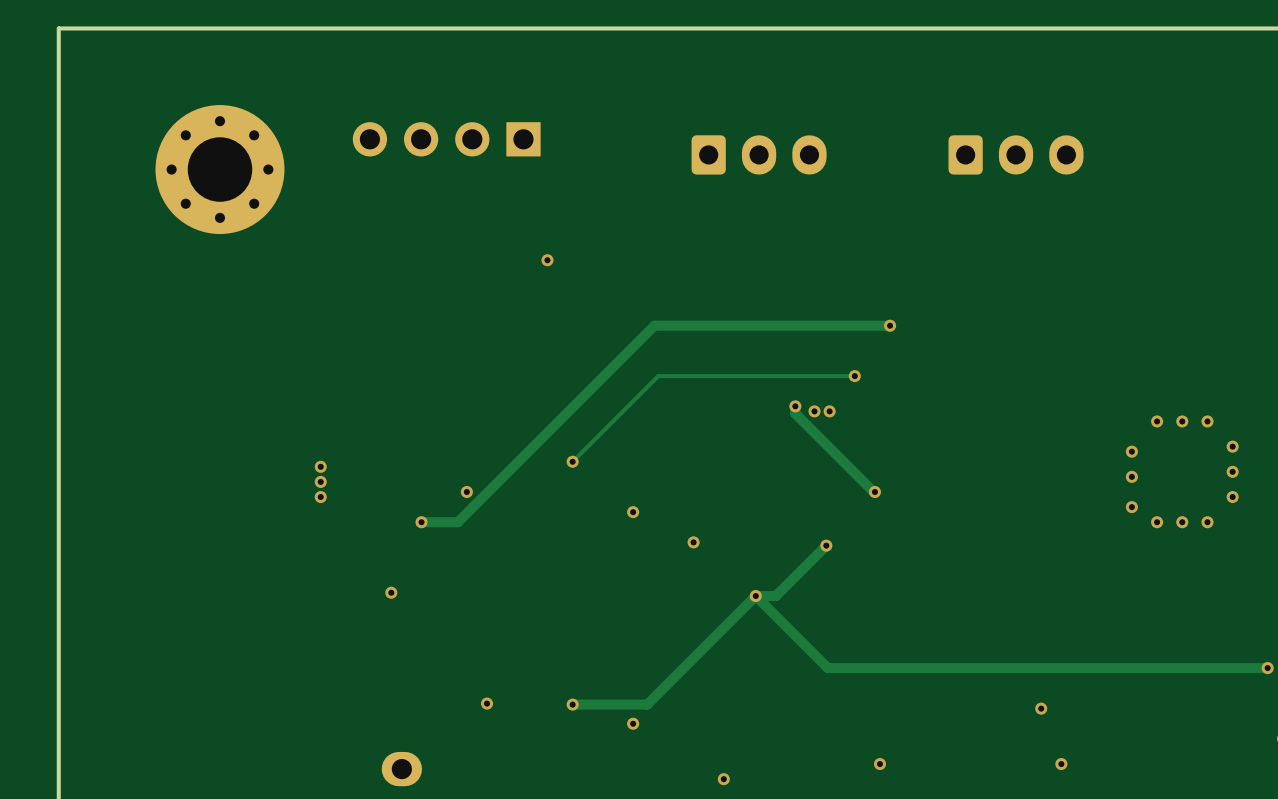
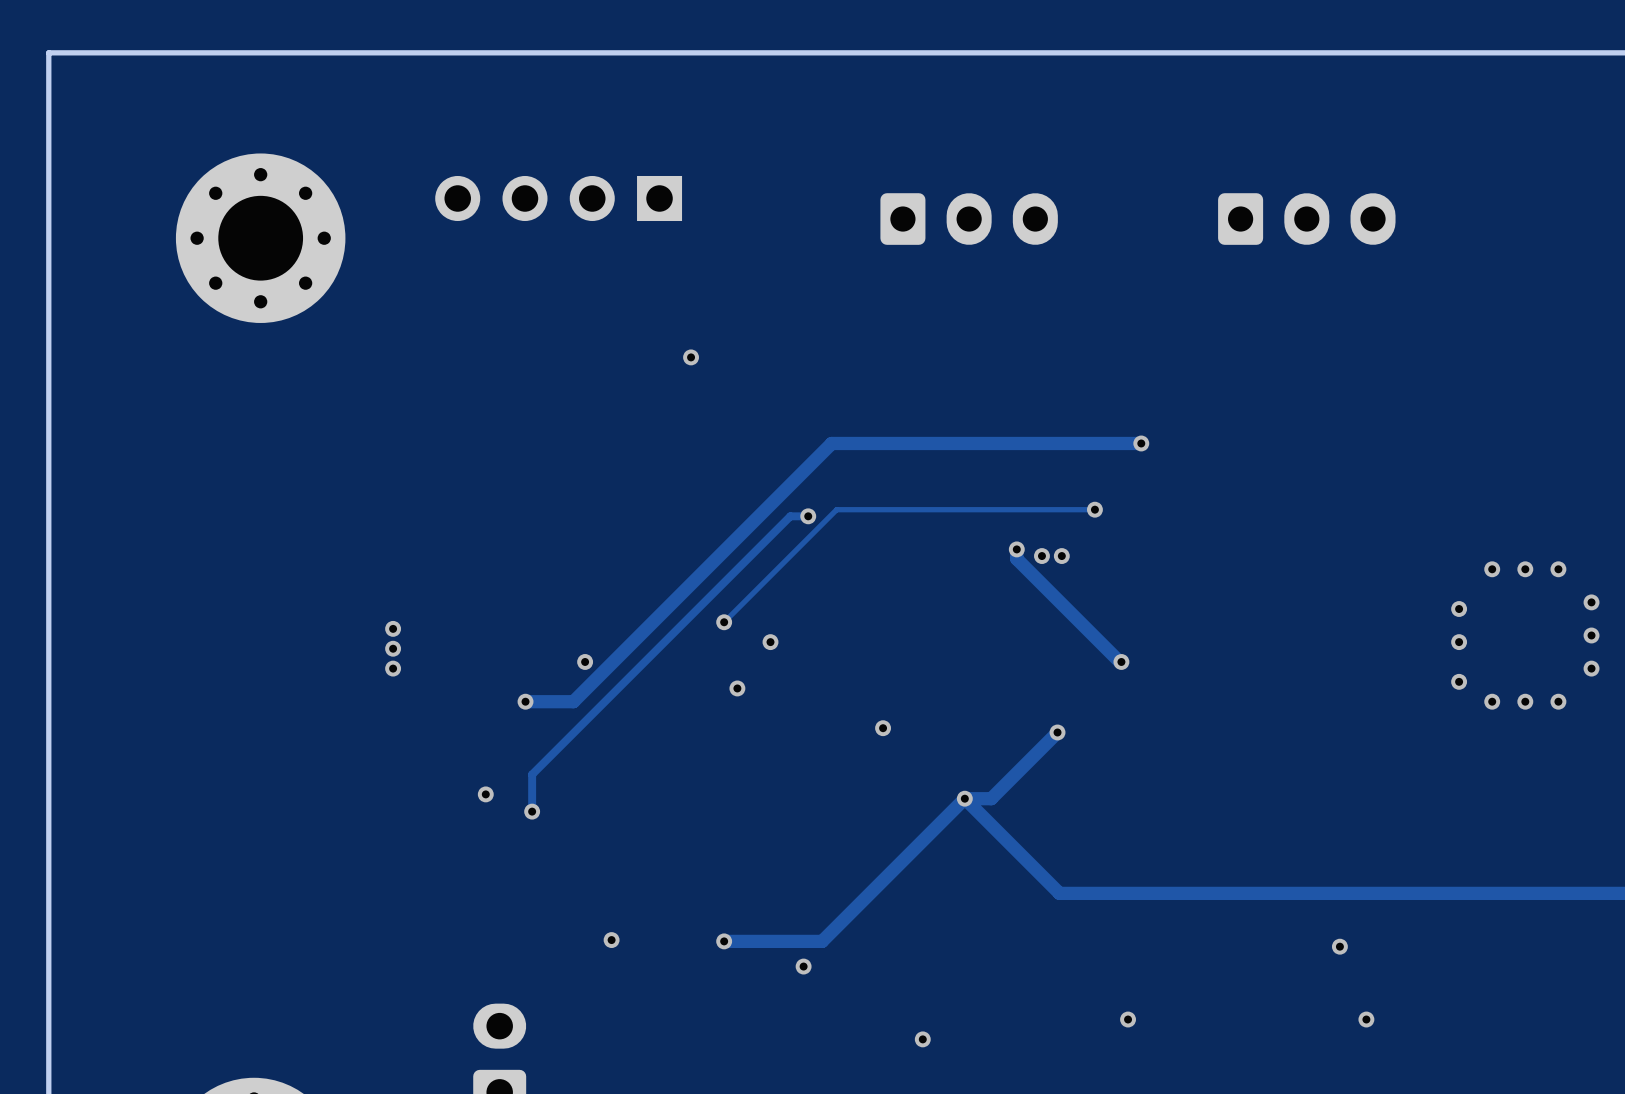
track: none -> (808, 516) (790, 516) (532, 774) (532, 811)
via: none -> (808, 516)
via: none -> (770, 642)
via: none -> (737, 688)
via: (633, 512) -> none
via: none -> (532, 811)

